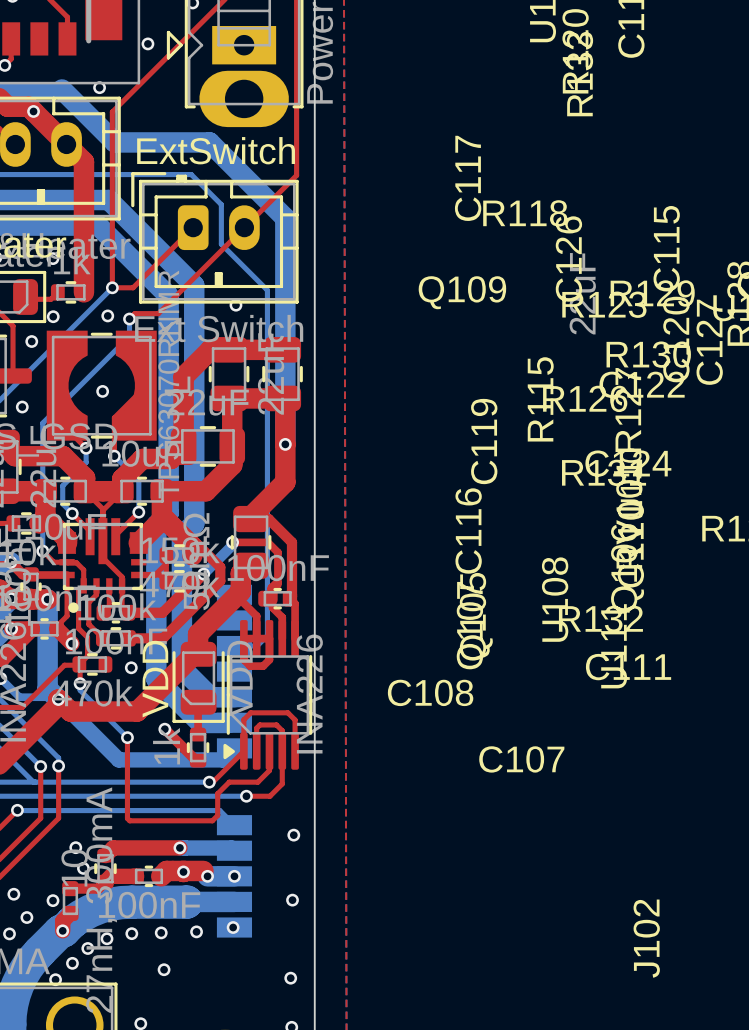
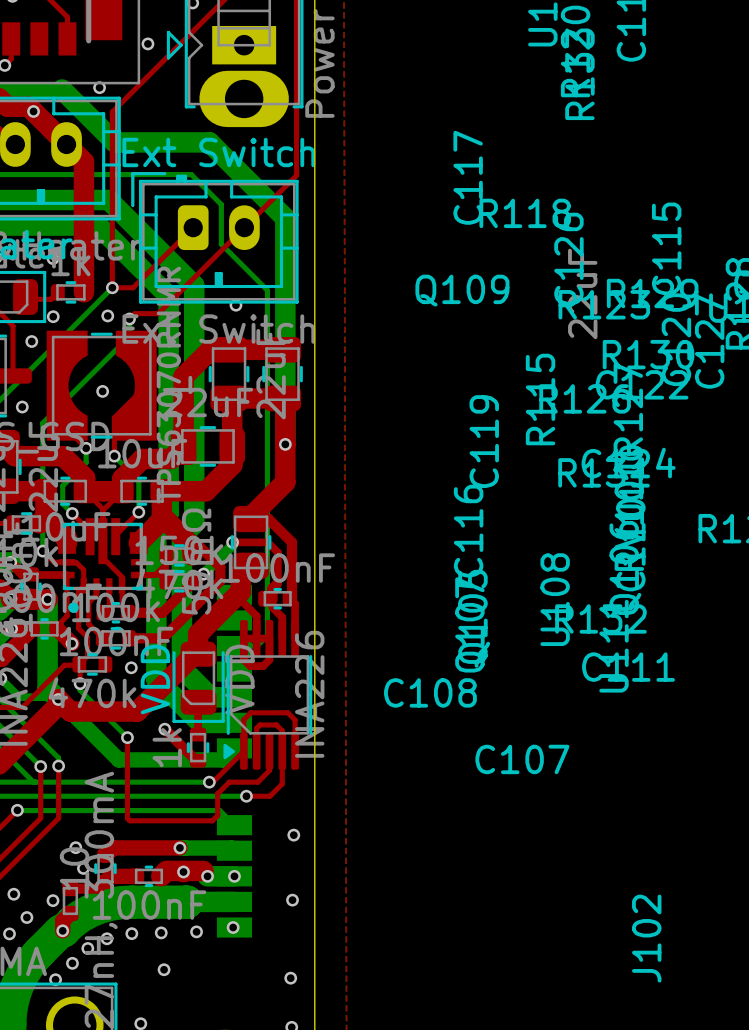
ExtSwitch name: ExtSwitch (216, 150) -> Ext Switch (218, 152)

